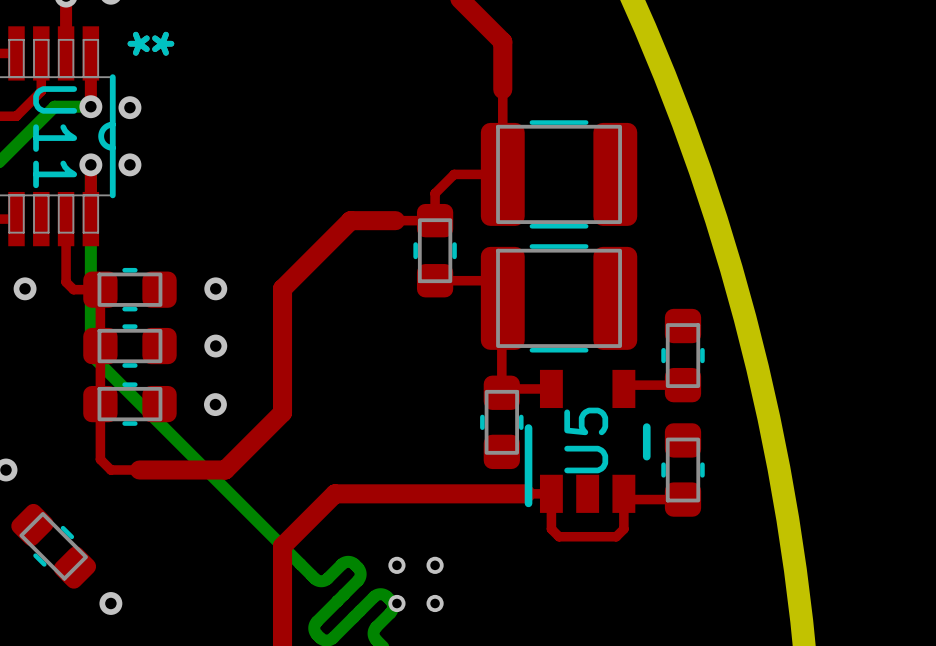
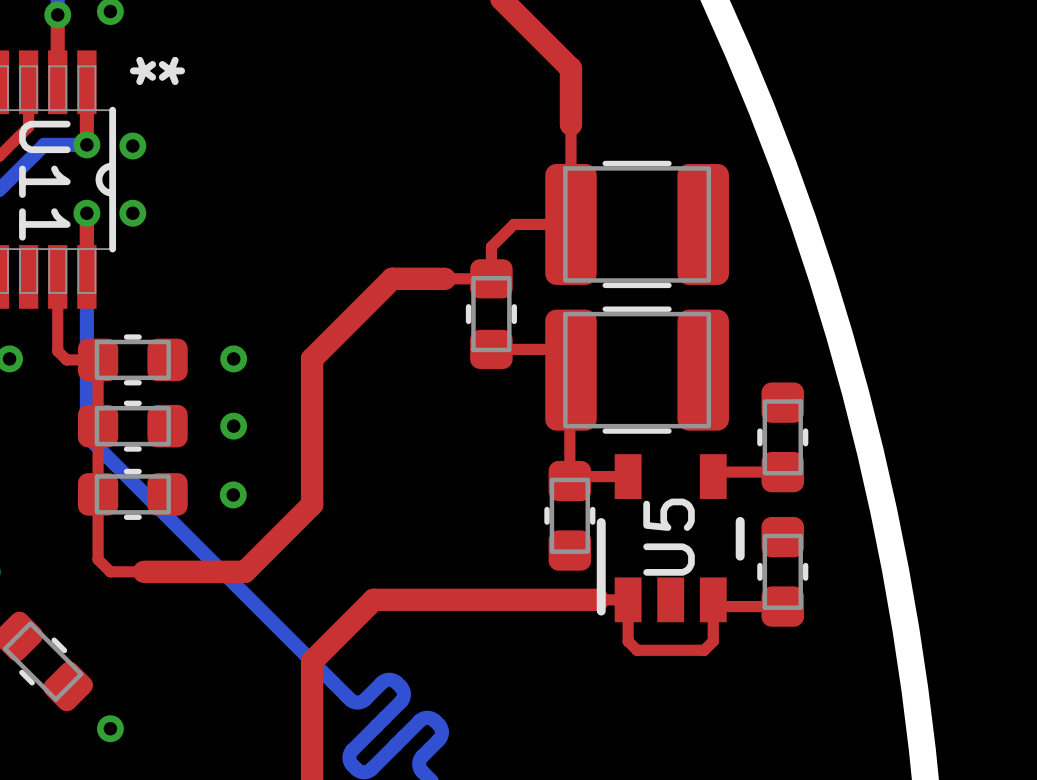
via: (396, 565) -> none
via: (435, 565) -> none
via: (396, 603) -> none
via: (435, 603) -> none

